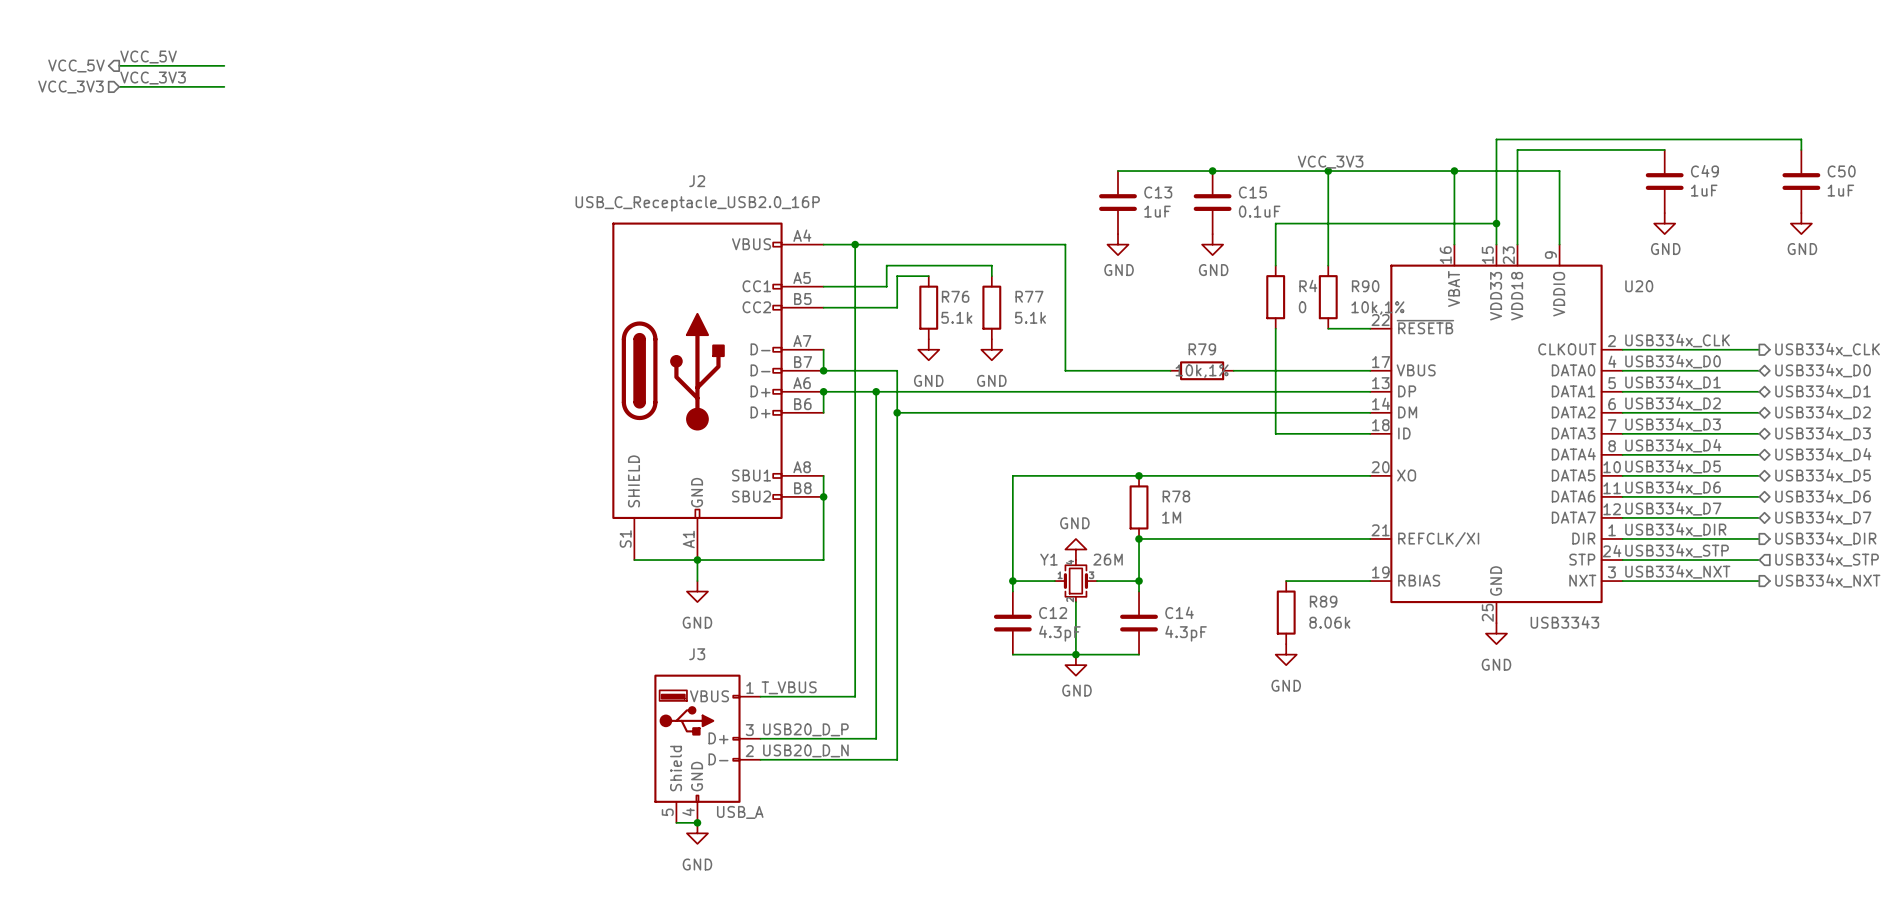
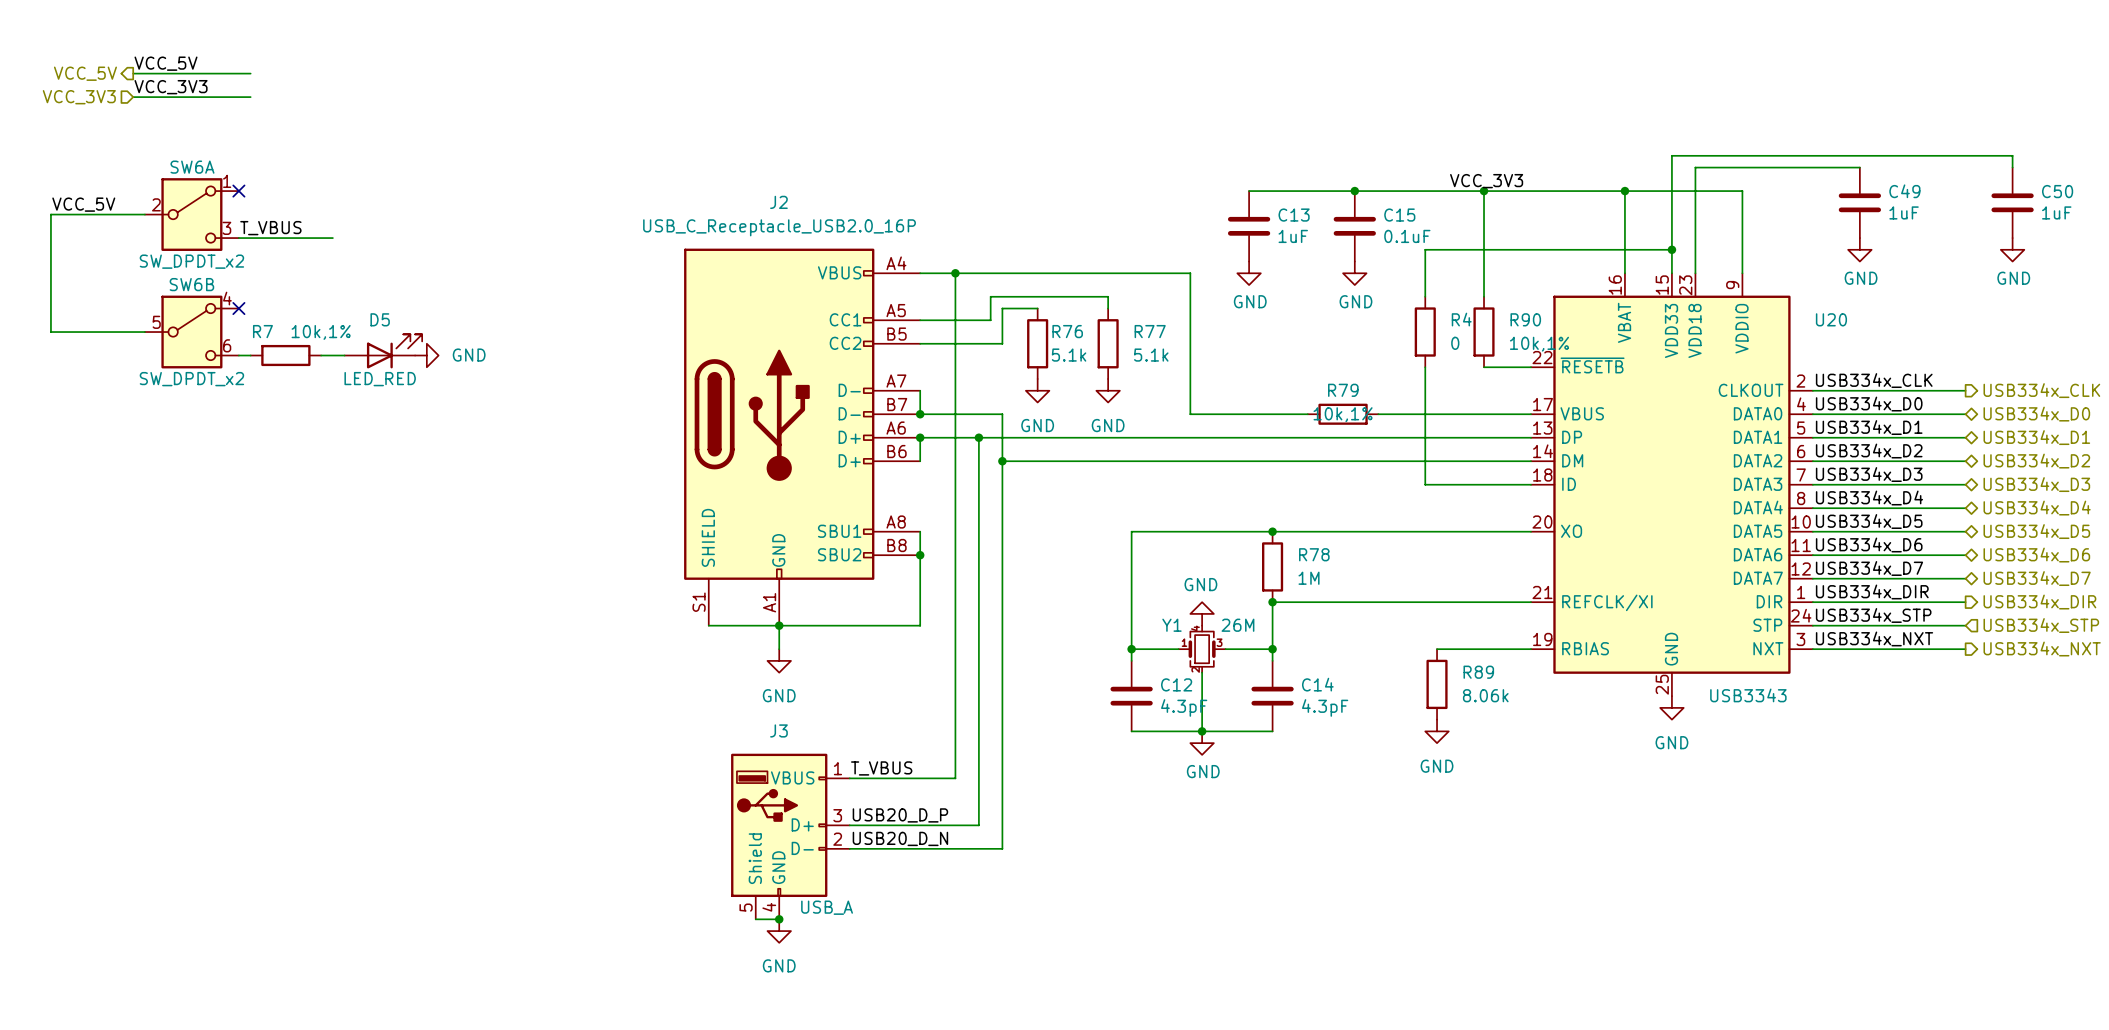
no-connect mark: none -> (238, 191)
label: none -> VCC_5V (83, 204)
wire: none -> (144, 214) (50, 214) (50, 332) (144, 332)
SW6A: none -> SW_DPDT_x2 (191, 214)
label: none -> T_VBUS (270, 228)
wire: none -> (238, 238) (332, 238)
no-connect mark: none -> (238, 308)
SW6B: none -> SW_DPDT_x2 (191, 332)
D5: none -> LED_RED (383, 351)
wire: none -> (238, 355) (250, 355)
R7: none -> 10k,1% (285, 355)
wire: none -> (321, 355) (344, 355)
power symbol: none -> GND (426, 355)

